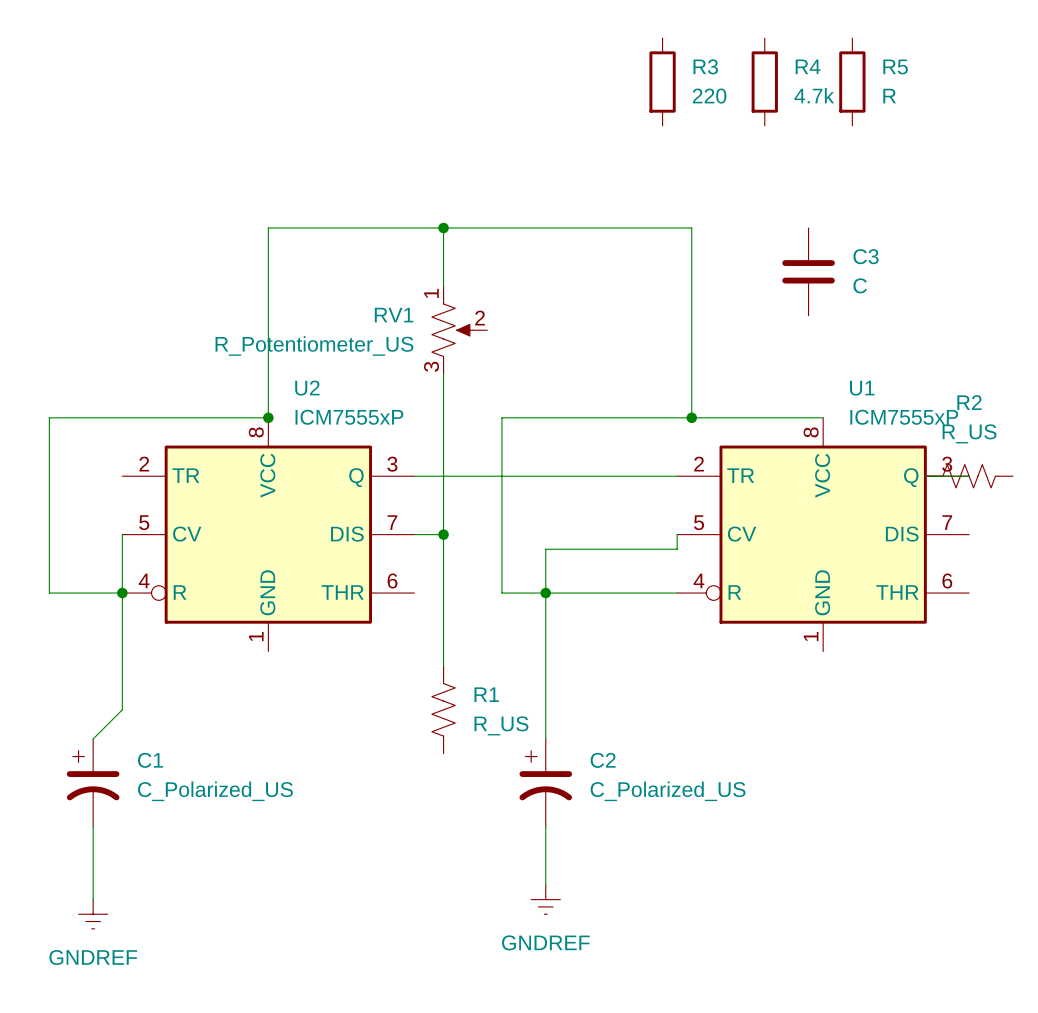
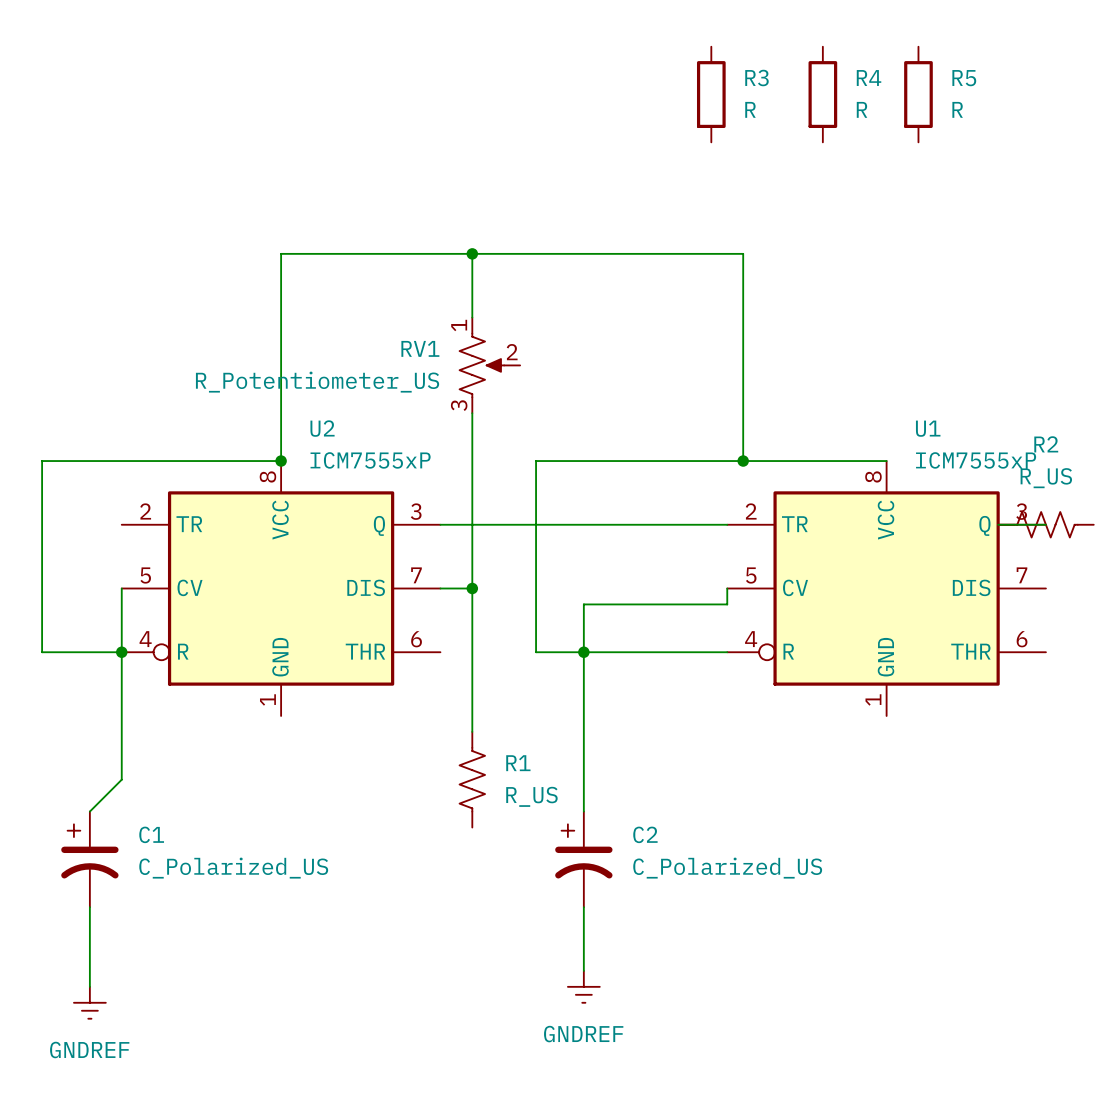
R4 value: 4.7k (814, 95) -> R (862, 109)
R3 value: 220 (709, 96) -> R (750, 109)
C3: C (808, 271) -> none

